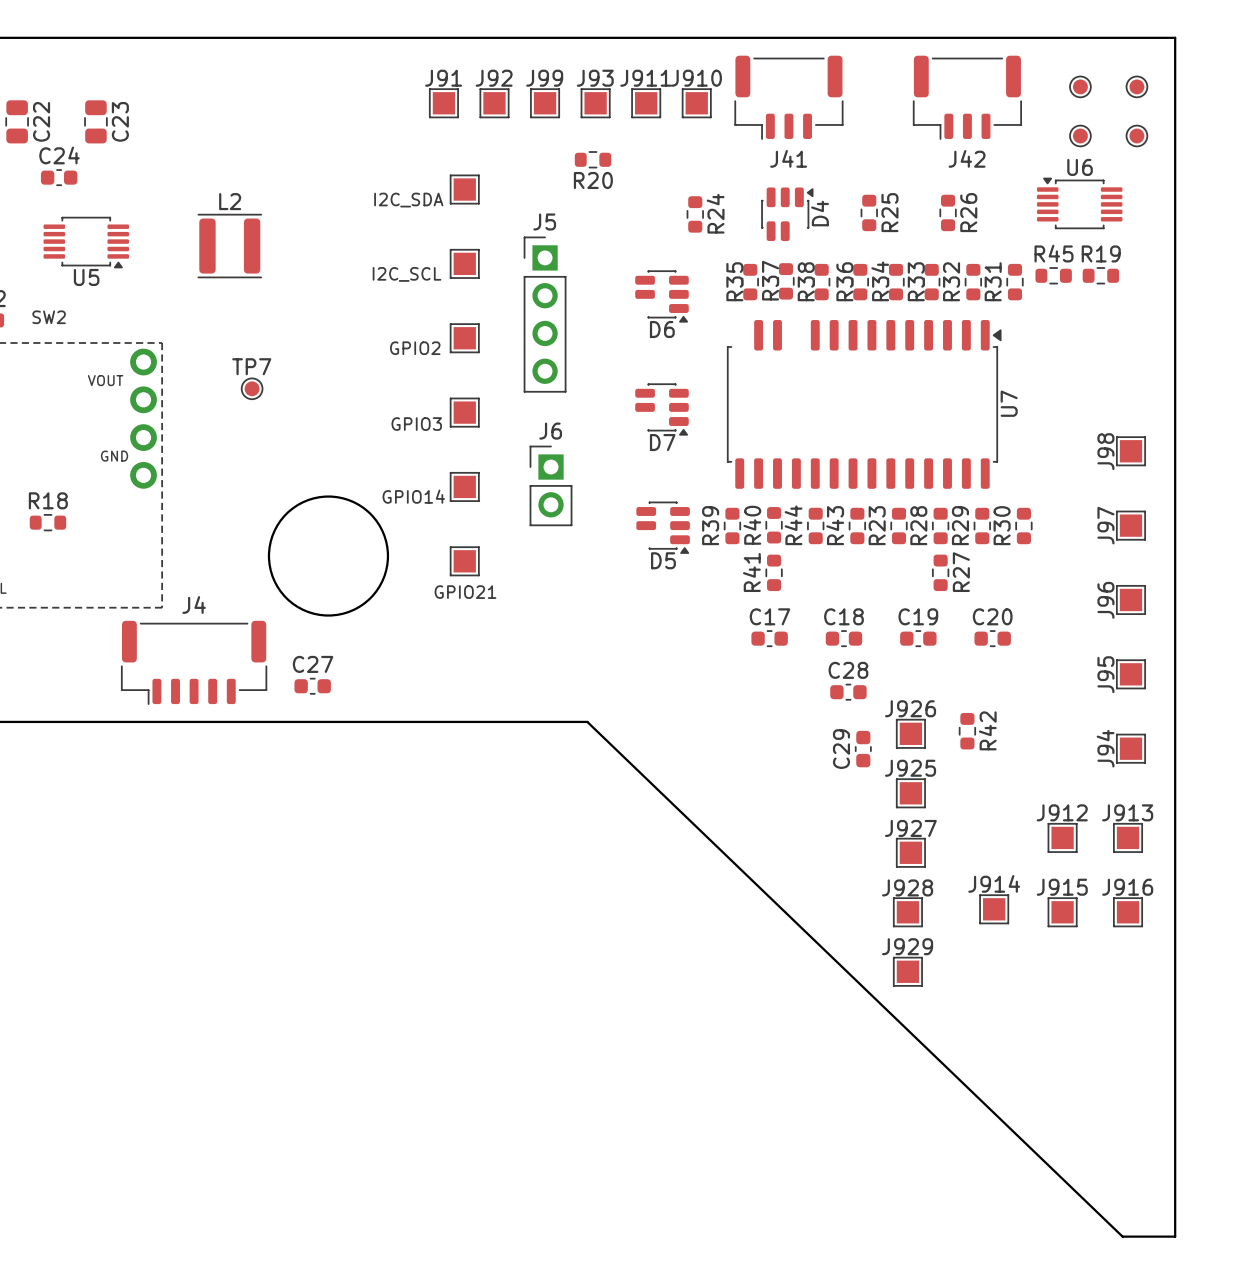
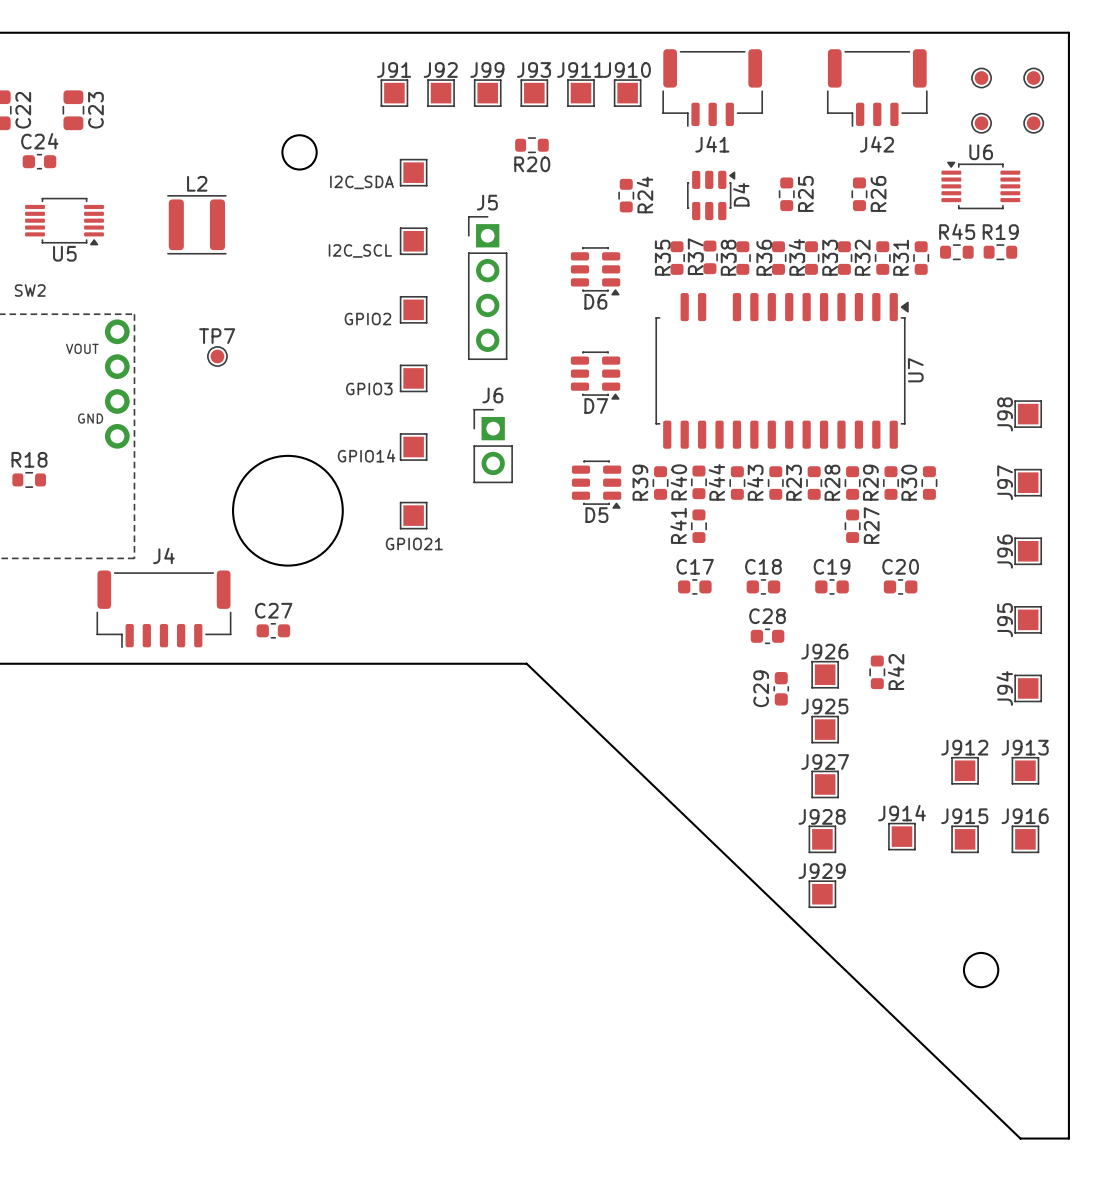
round board edge: none -> [281, 134, 318, 171]
D4 footprint: [761, 187, 814, 242] -> [687, 170, 736, 221]
D6 footprint: [635, 270, 689, 323] -> [570, 247, 621, 296]
D7 footprint: [635, 383, 689, 436] -> [570, 351, 621, 400]
D5 footprint: [636, 501, 690, 554] -> [571, 460, 622, 509]
round board edge: none -> [962, 951, 1000, 989]

